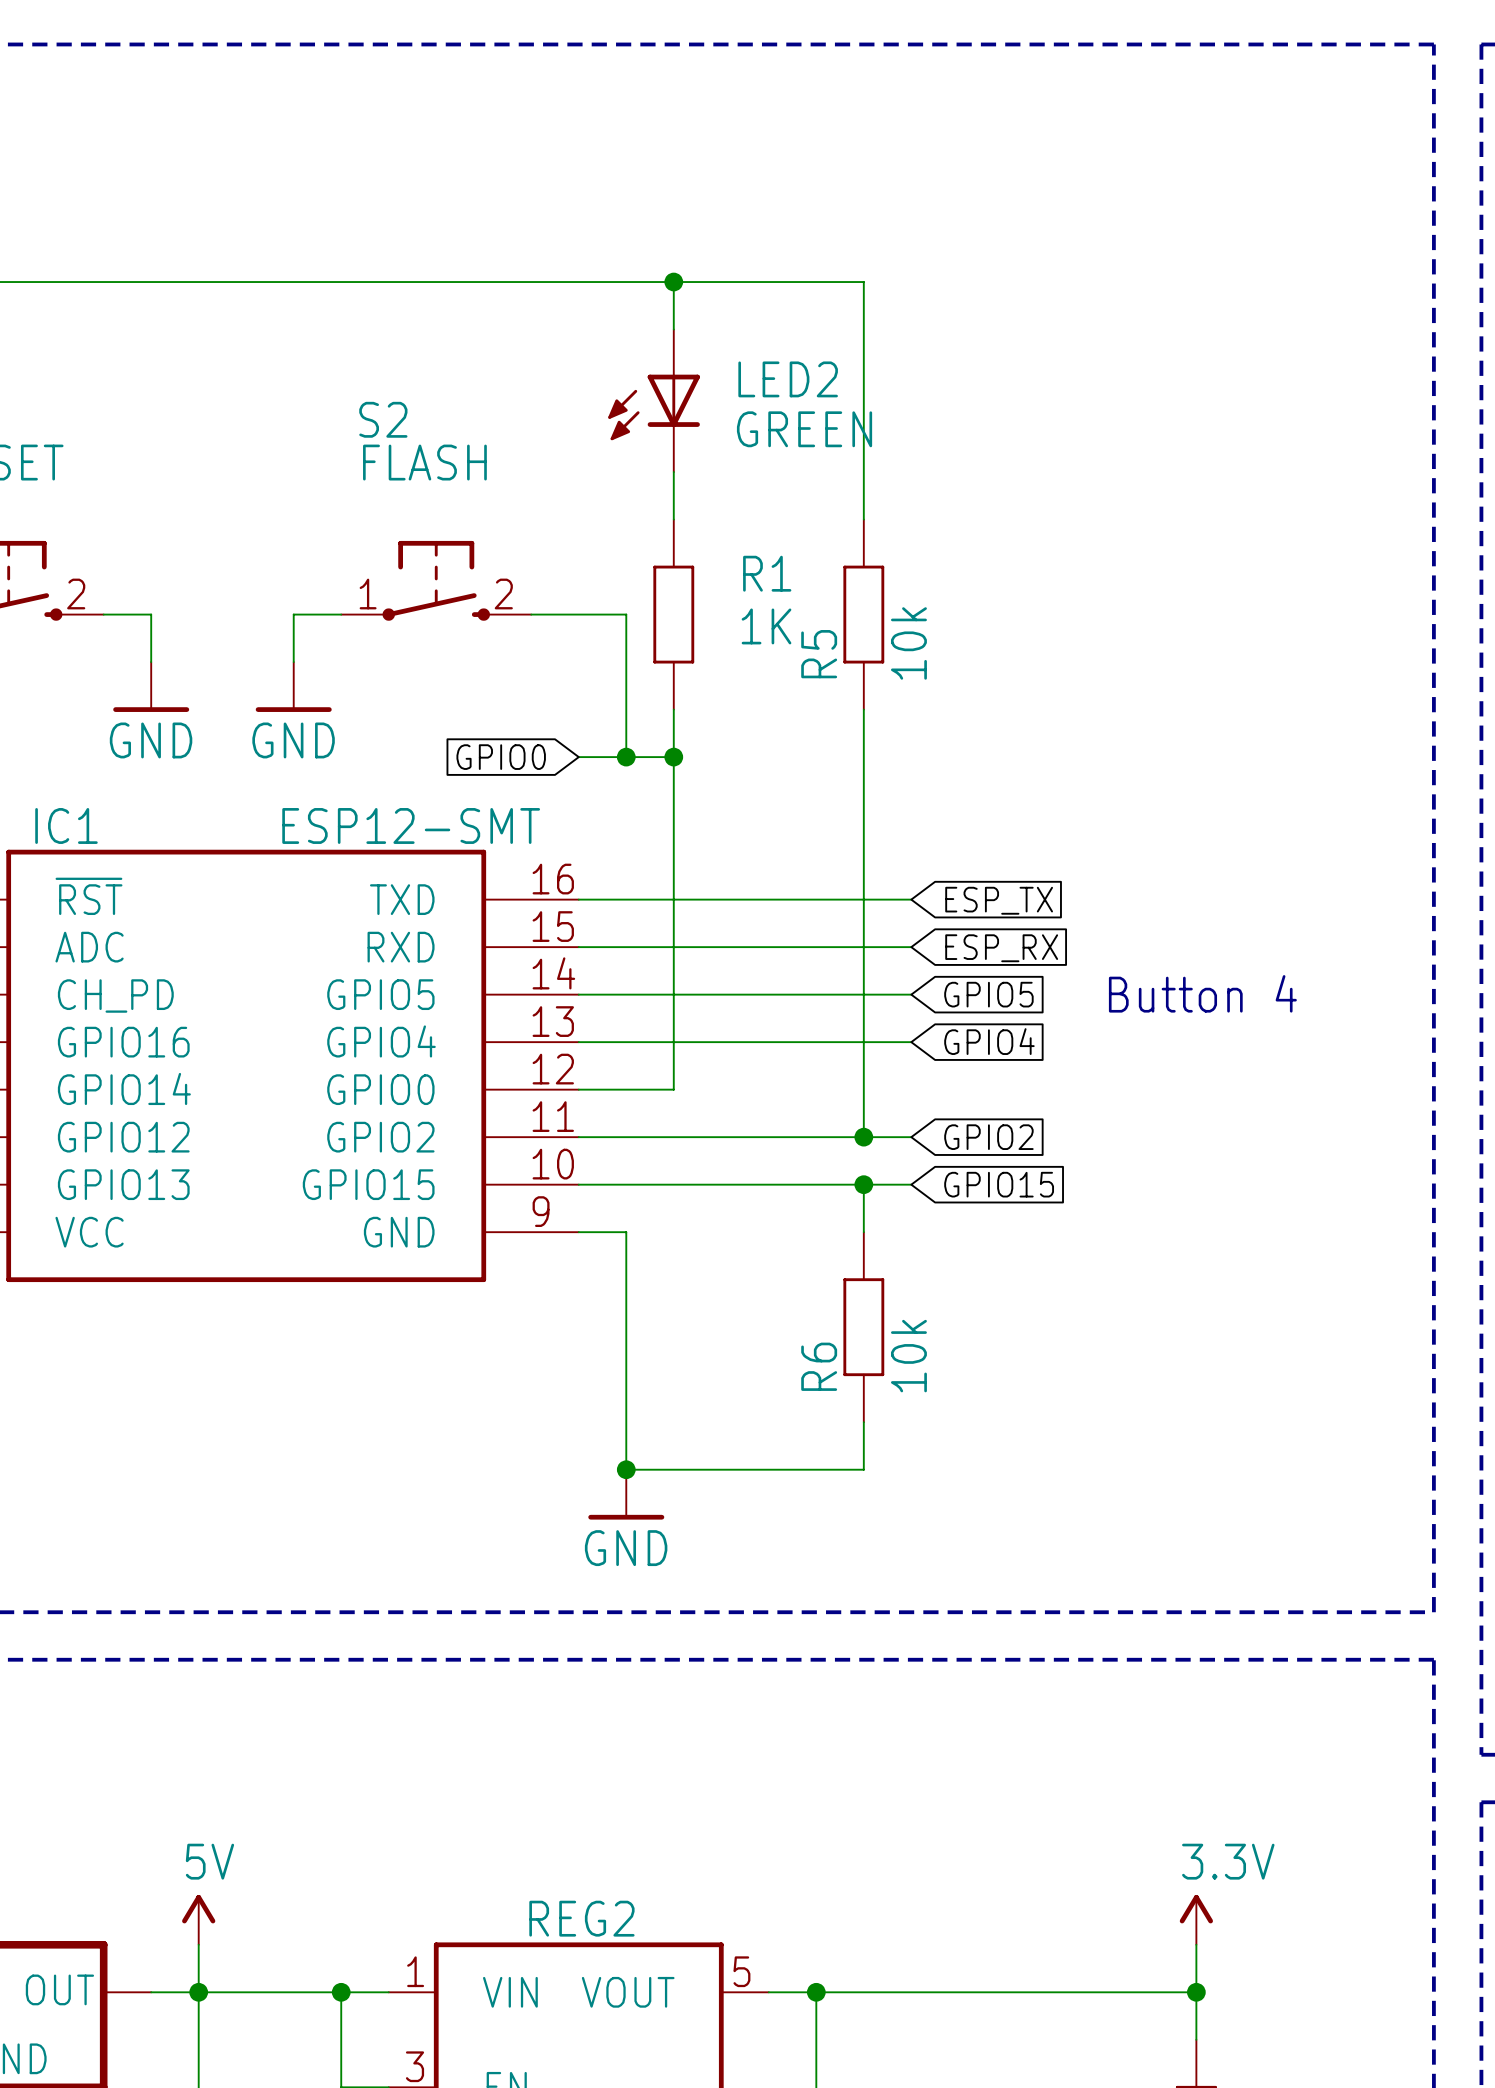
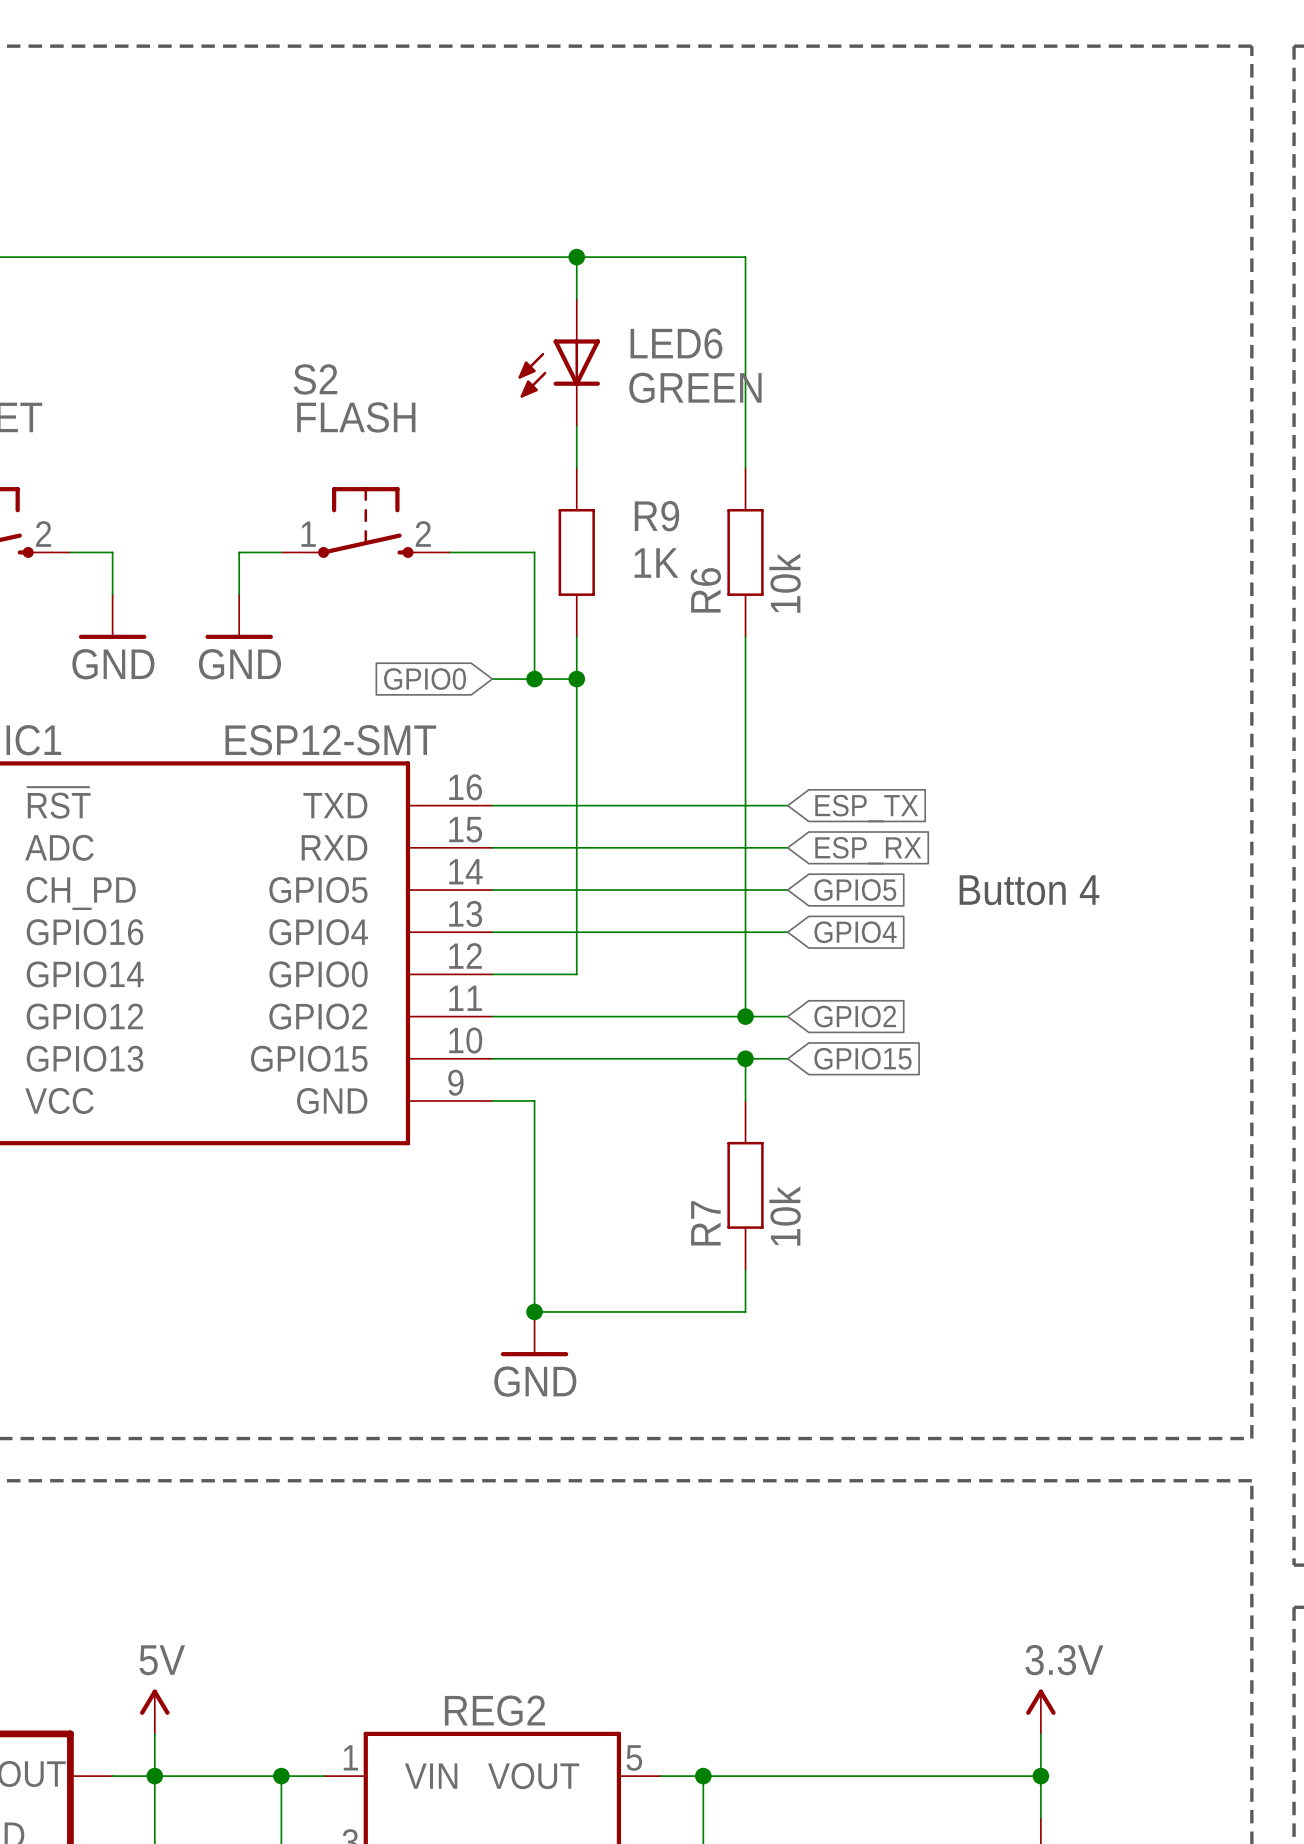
LED2 name: LED2 (788, 379) -> LED6 (676, 343)
R1 name: R1 (767, 573) -> R9 (656, 516)
R5 name: R5 (819, 654) -> R6 (705, 590)
R6 name: R6 (819, 1366) -> R7 (705, 1223)

